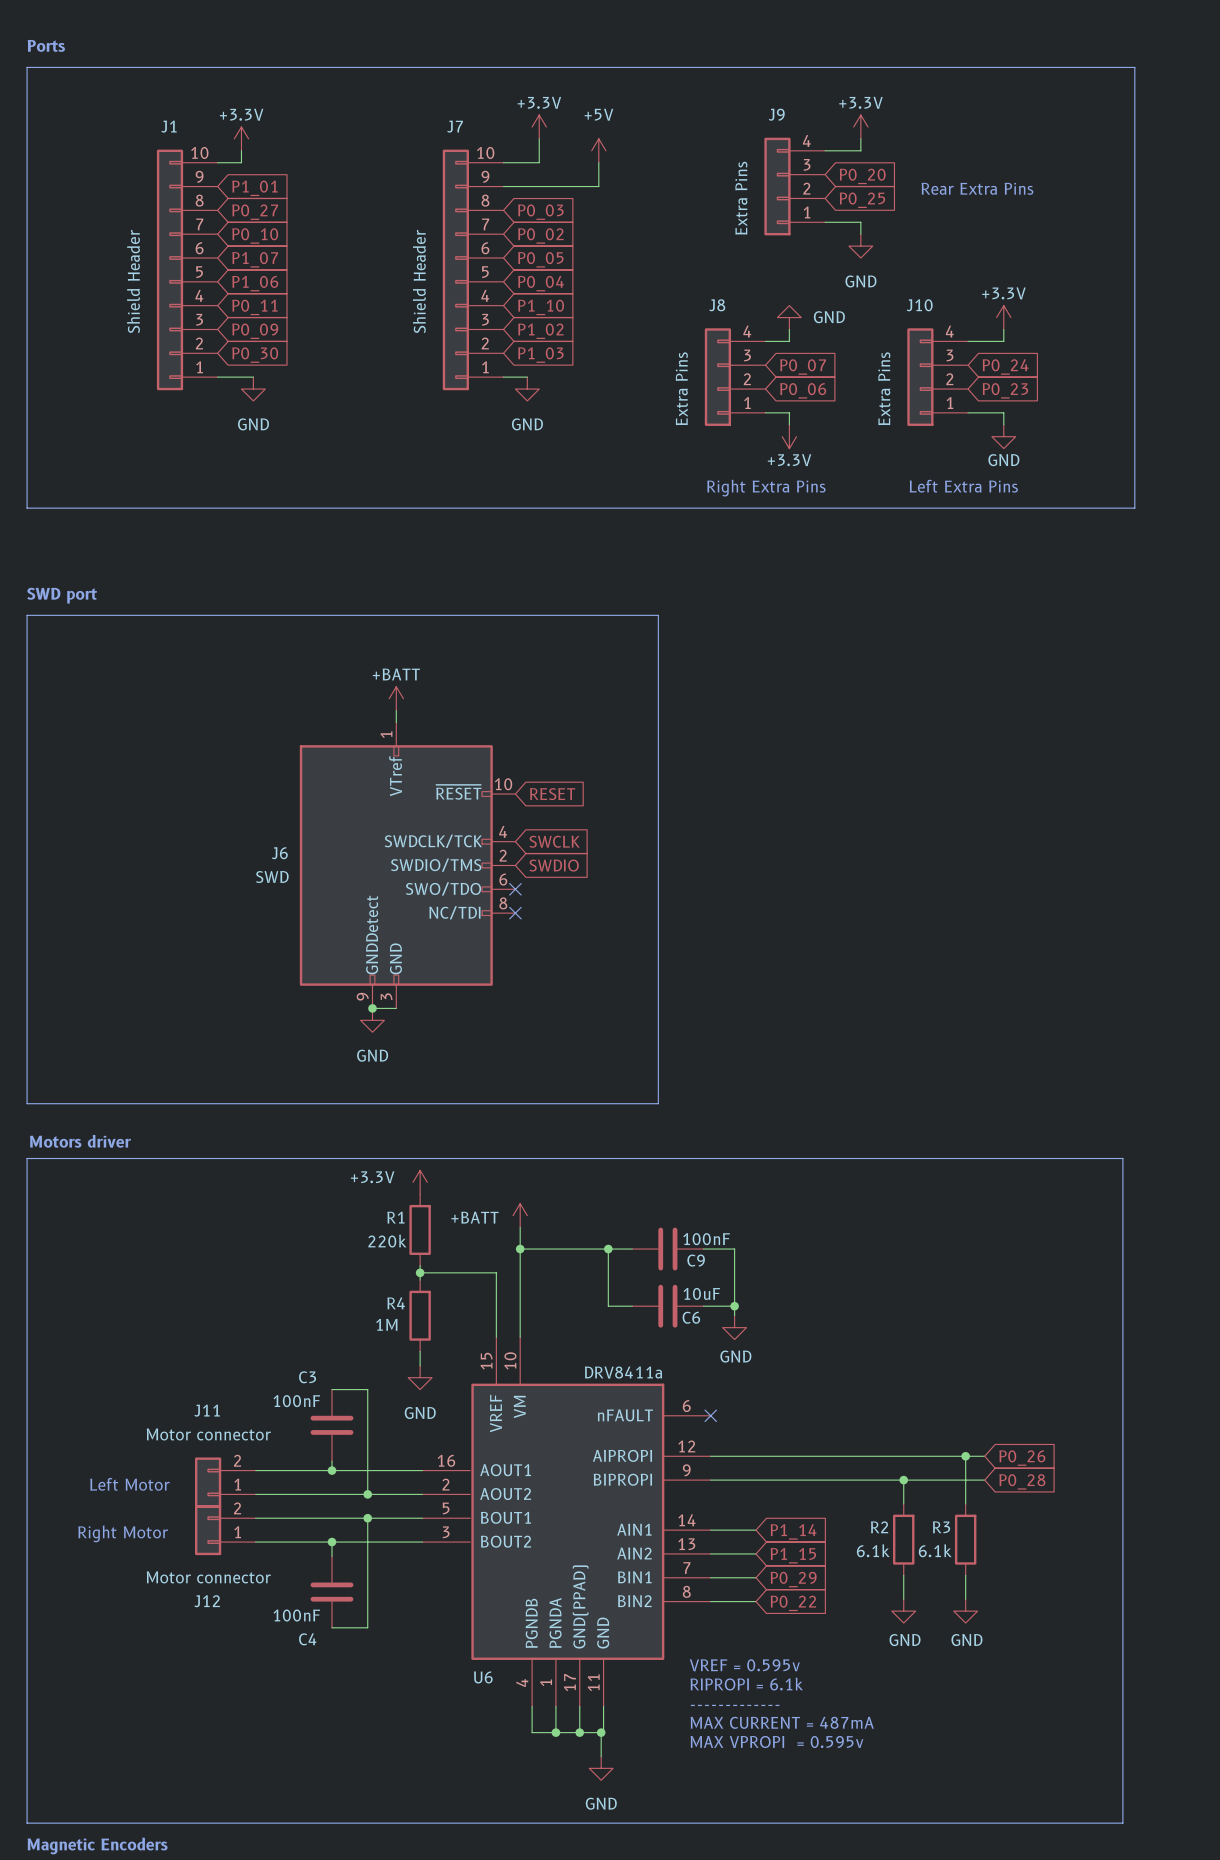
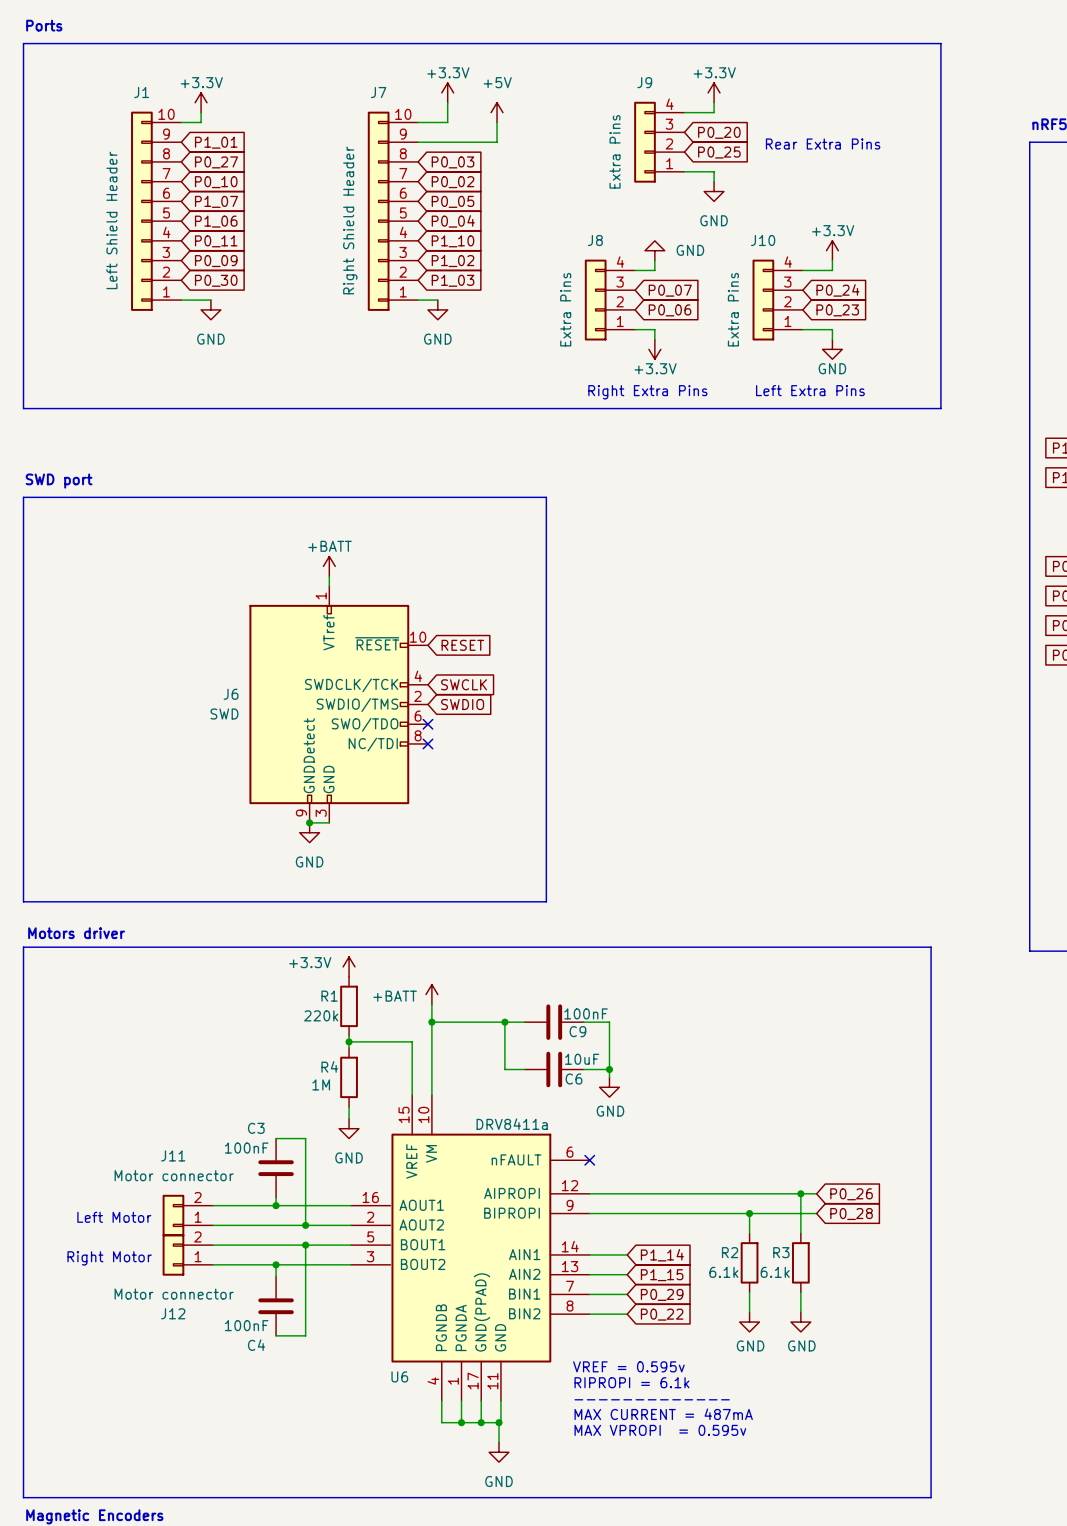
J1 value: Shield Header (133, 281) -> Left Shield Header (111, 220)
J7 value: Shield Header (419, 281) -> Right Shield Header (350, 220)

